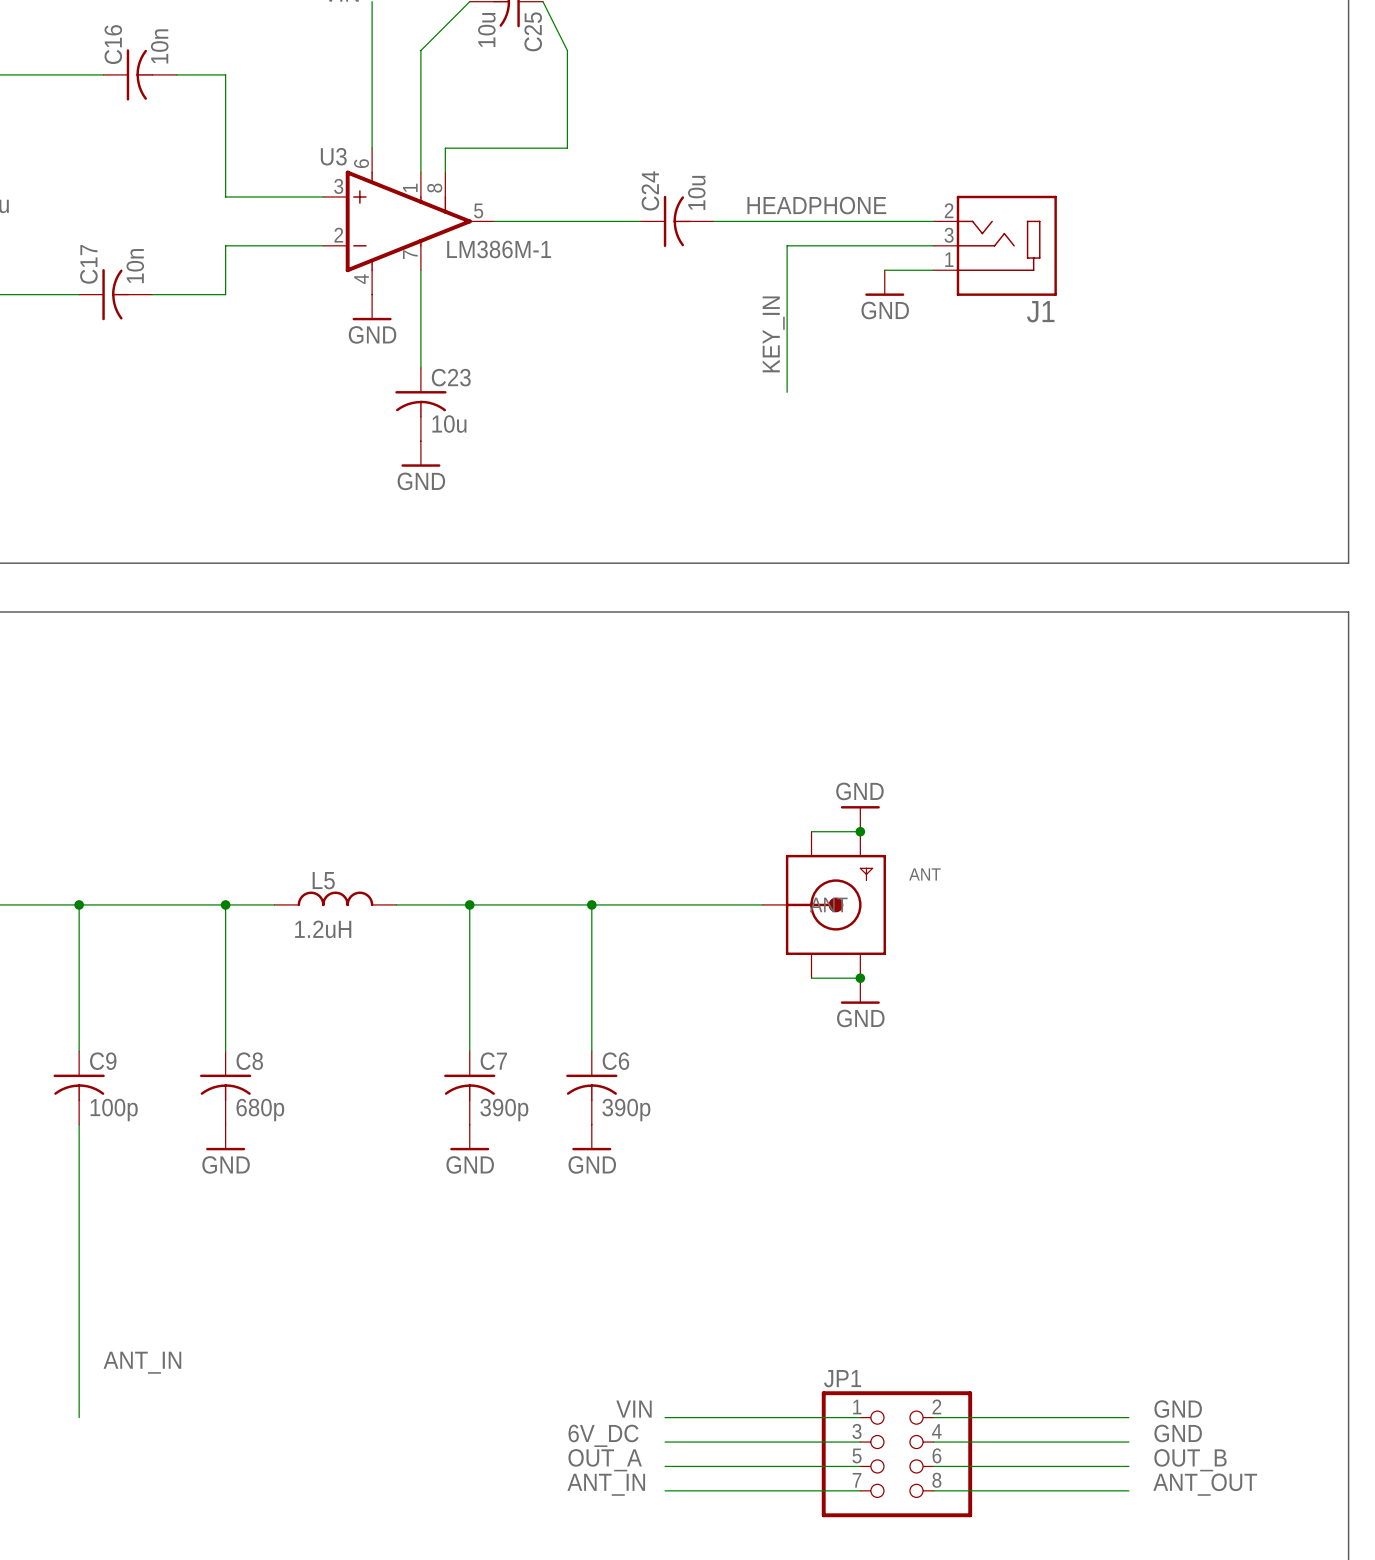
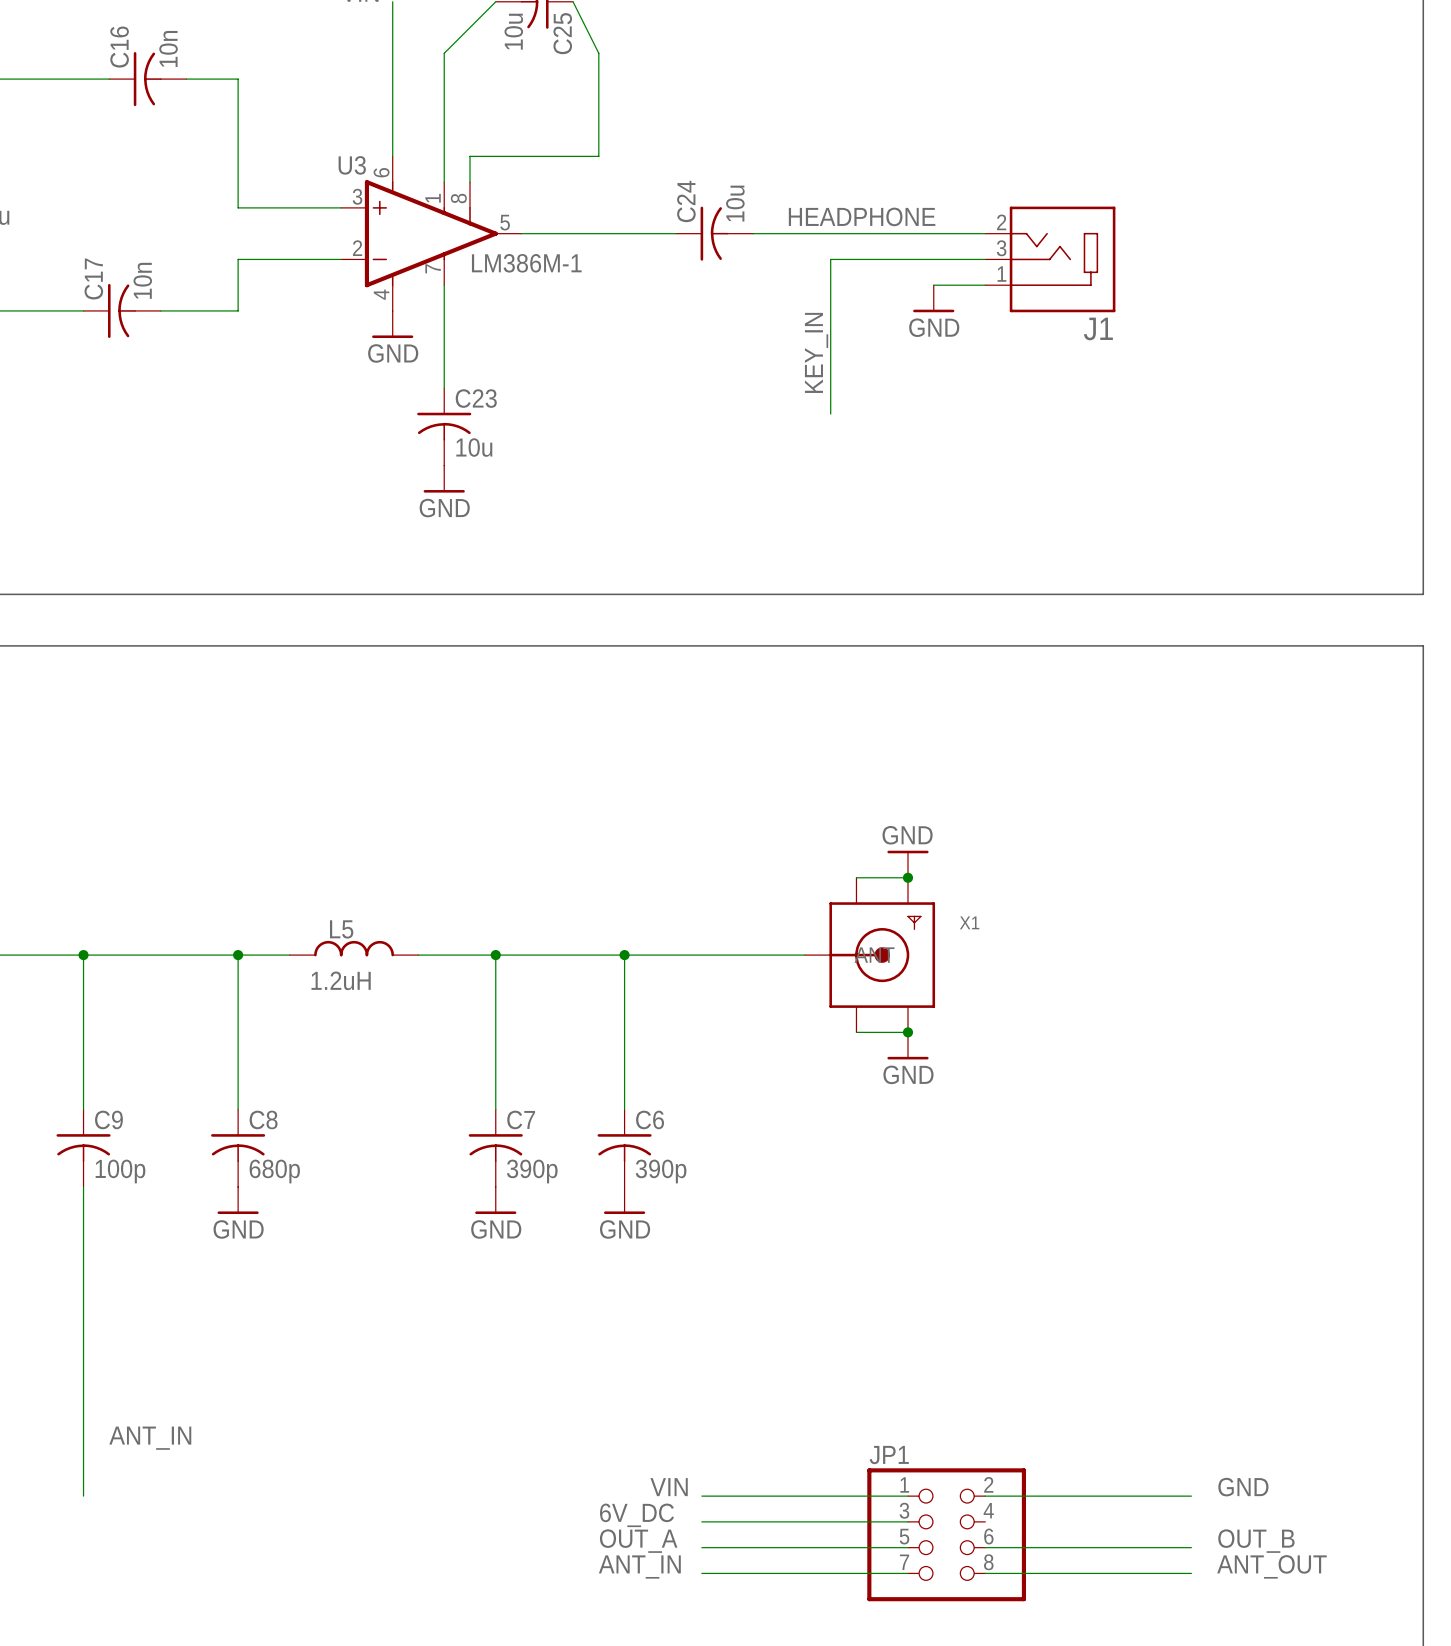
ANT name: ANT (924, 874) -> X1 (969, 922)
label: GND (1178, 1433) -> none
wire: (933, 1442) (1128, 1442) -> none

